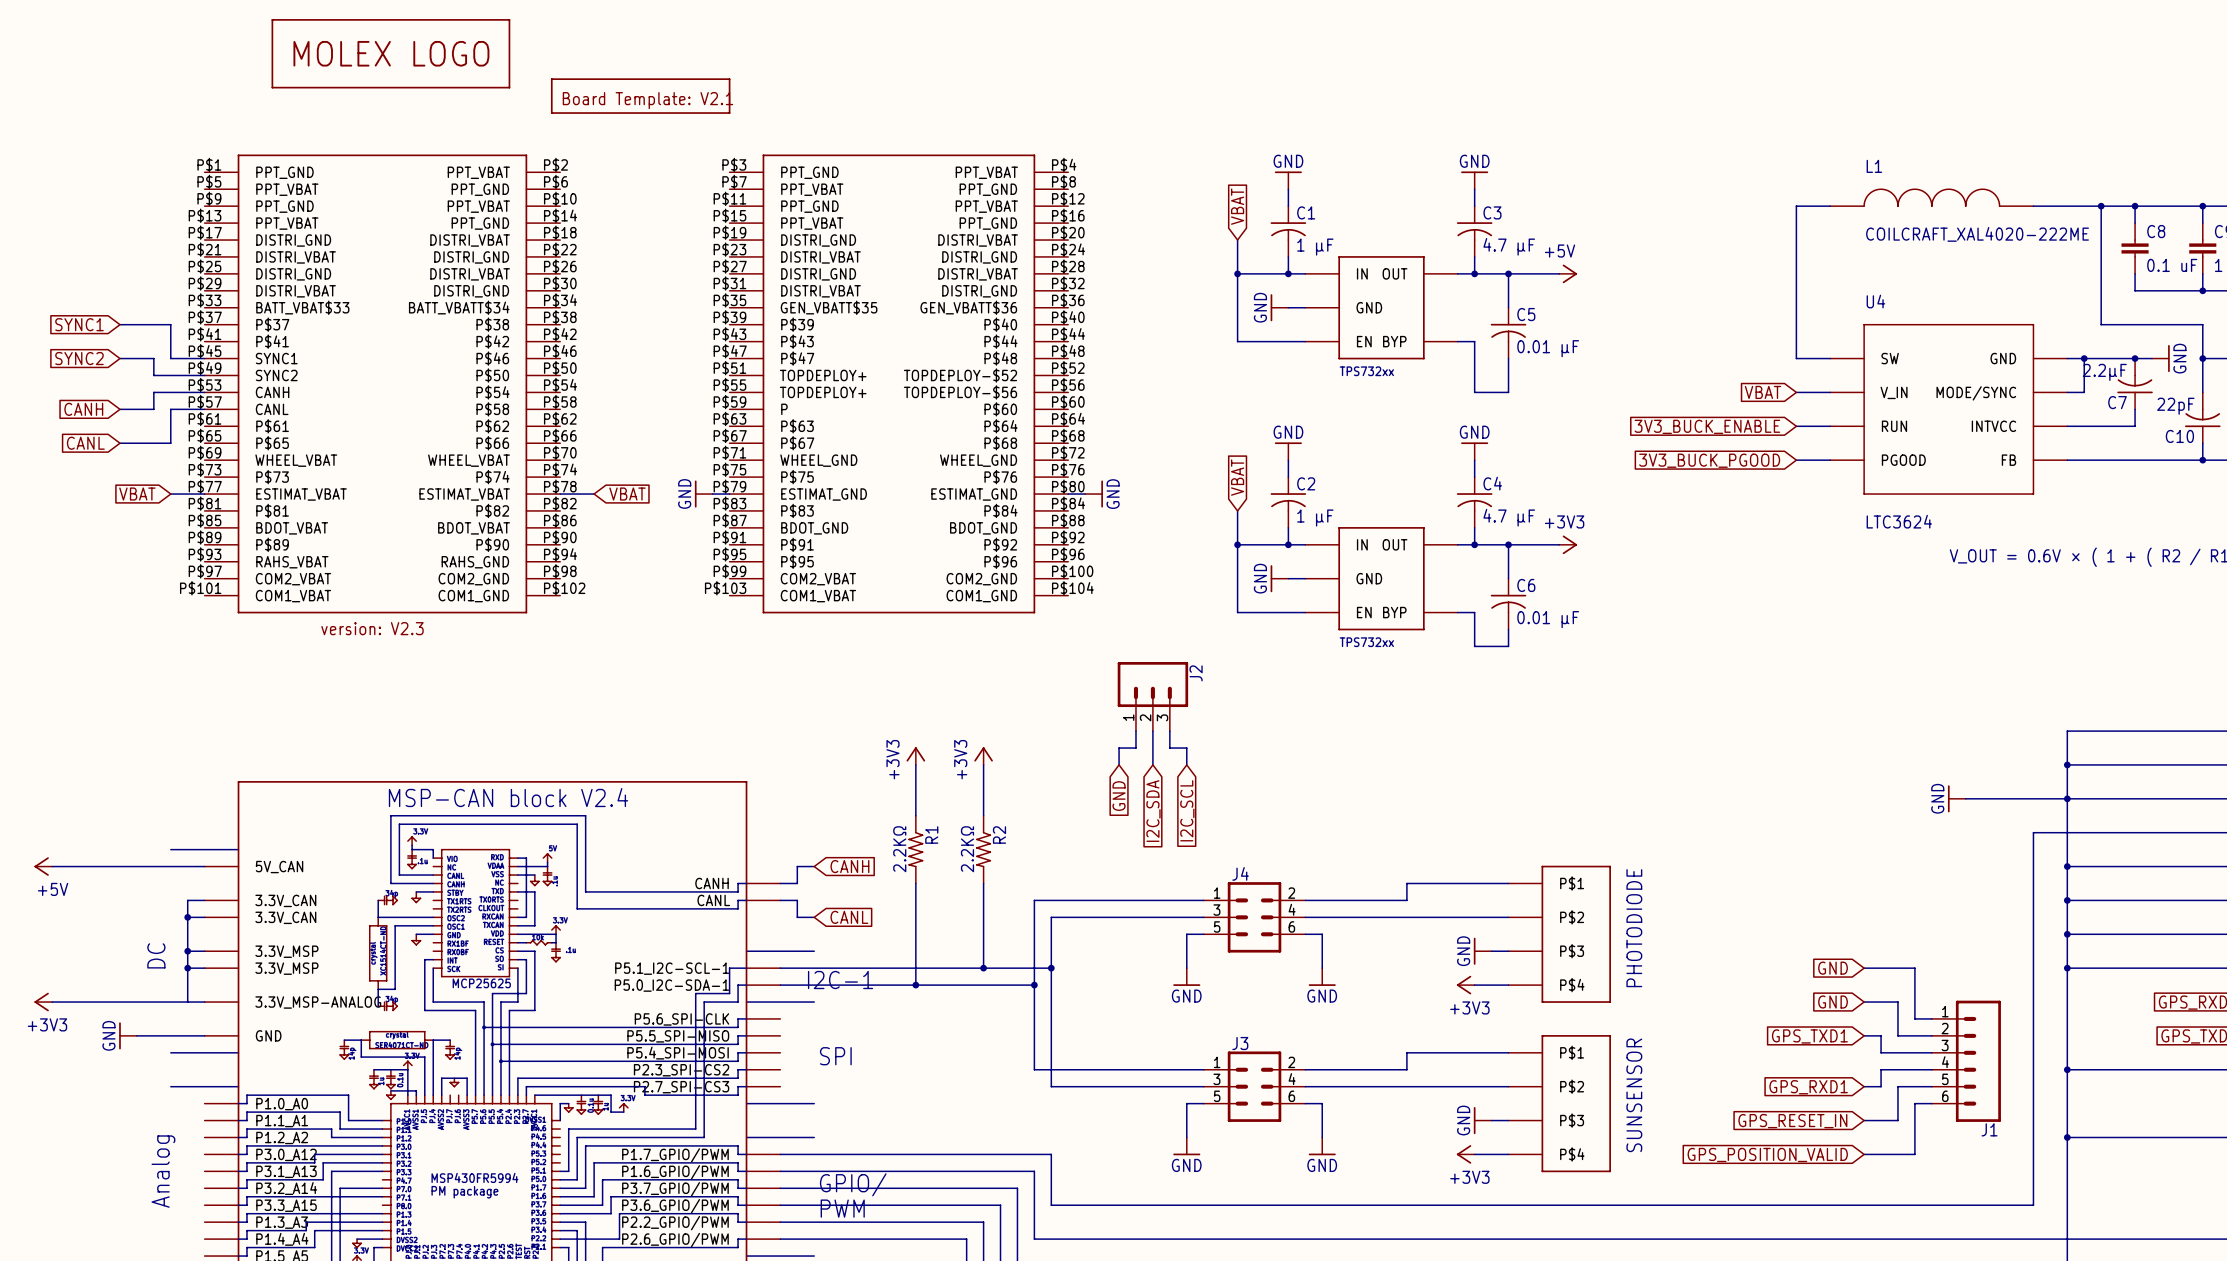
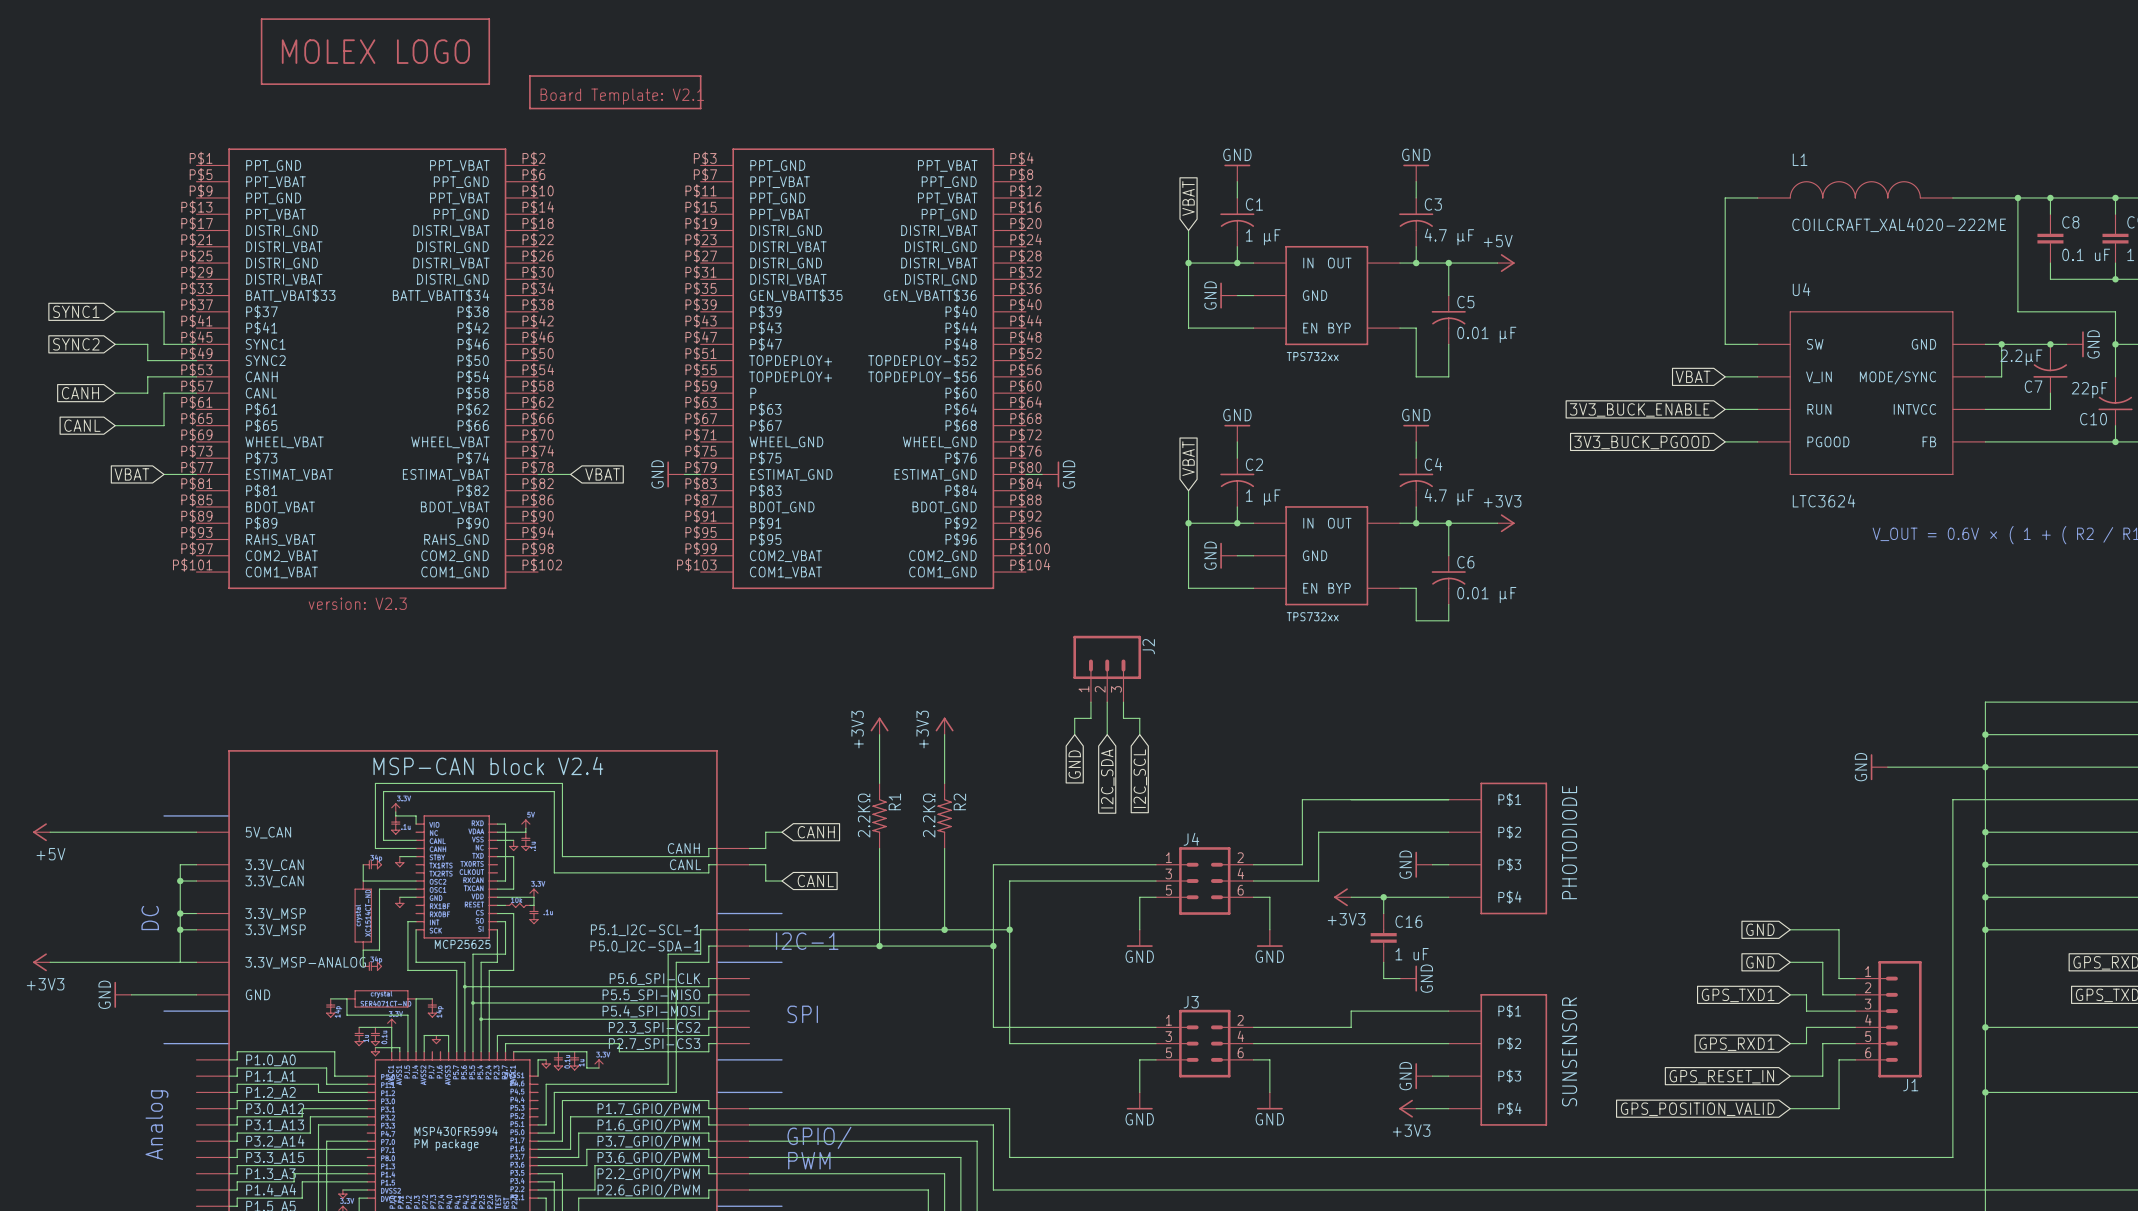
wire: (1508, 883) (1406, 883) (1406, 900) (1356, 900) -> (1448, 799) (1302, 799) (1302, 864)
power symbol: none -> GND (1423, 864)
wire: (1373, 917) (1508, 917) -> (1318, 881) (1318, 832) (1448, 832)
wire: none -> (1351, 897) (1448, 897)
wire: none -> (1383, 897) (1383, 913)
junction: none -> (1383, 897)
PHOTODIODE position: (1559, 934) -> (1497, 848)
power symbol: GND (1482, 951) -> none
wire: (1491, 951) (1508, 951) -> (1432, 864) (1448, 864)
C16: none -> 1 uF (1383, 937)
power symbol position: +3V3 (1465, 985) -> +3V3 (1342, 897)
wire: (1474, 985) (1508, 985) -> none
wire: none -> (1383, 962) (1383, 978) (1399, 978)
power symbol: none -> GND (1408, 978)

